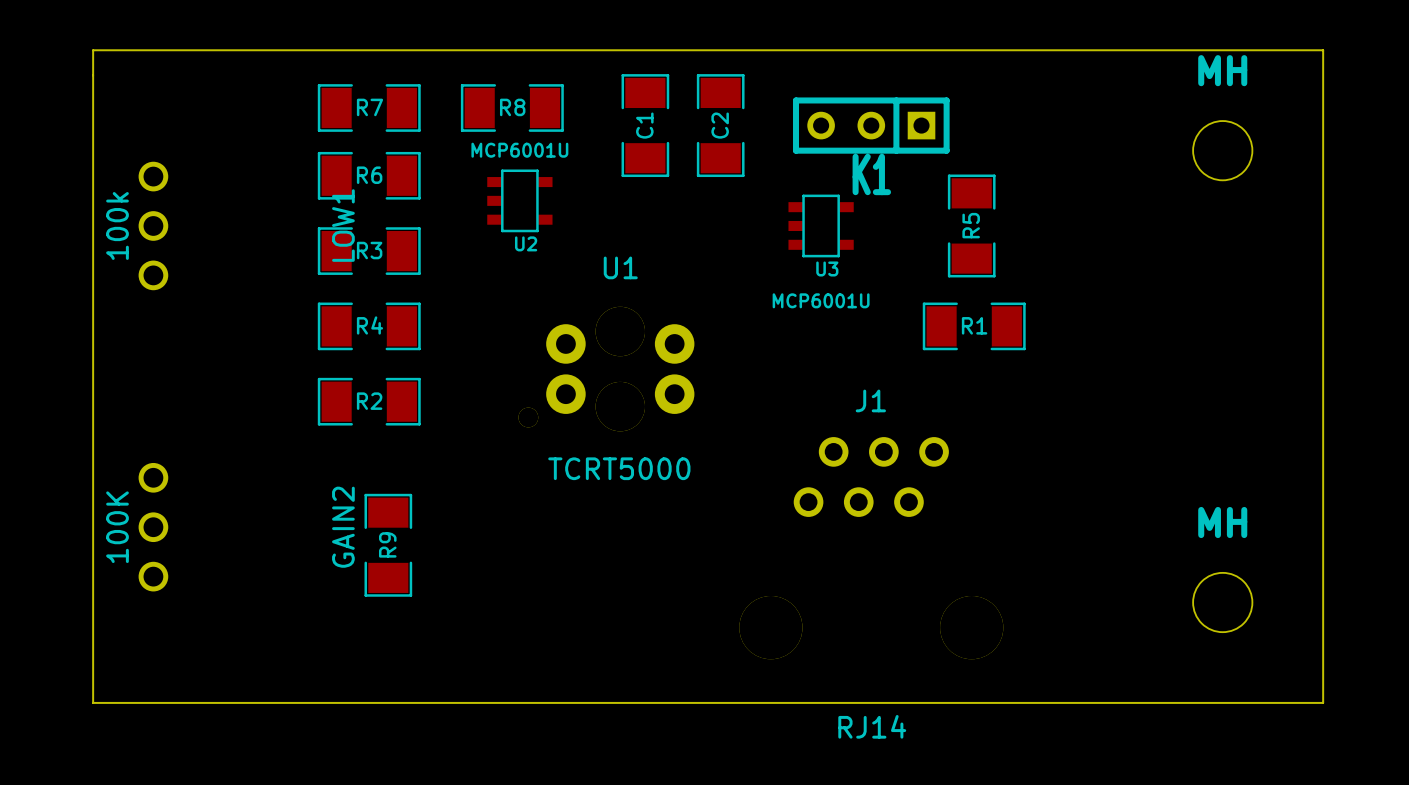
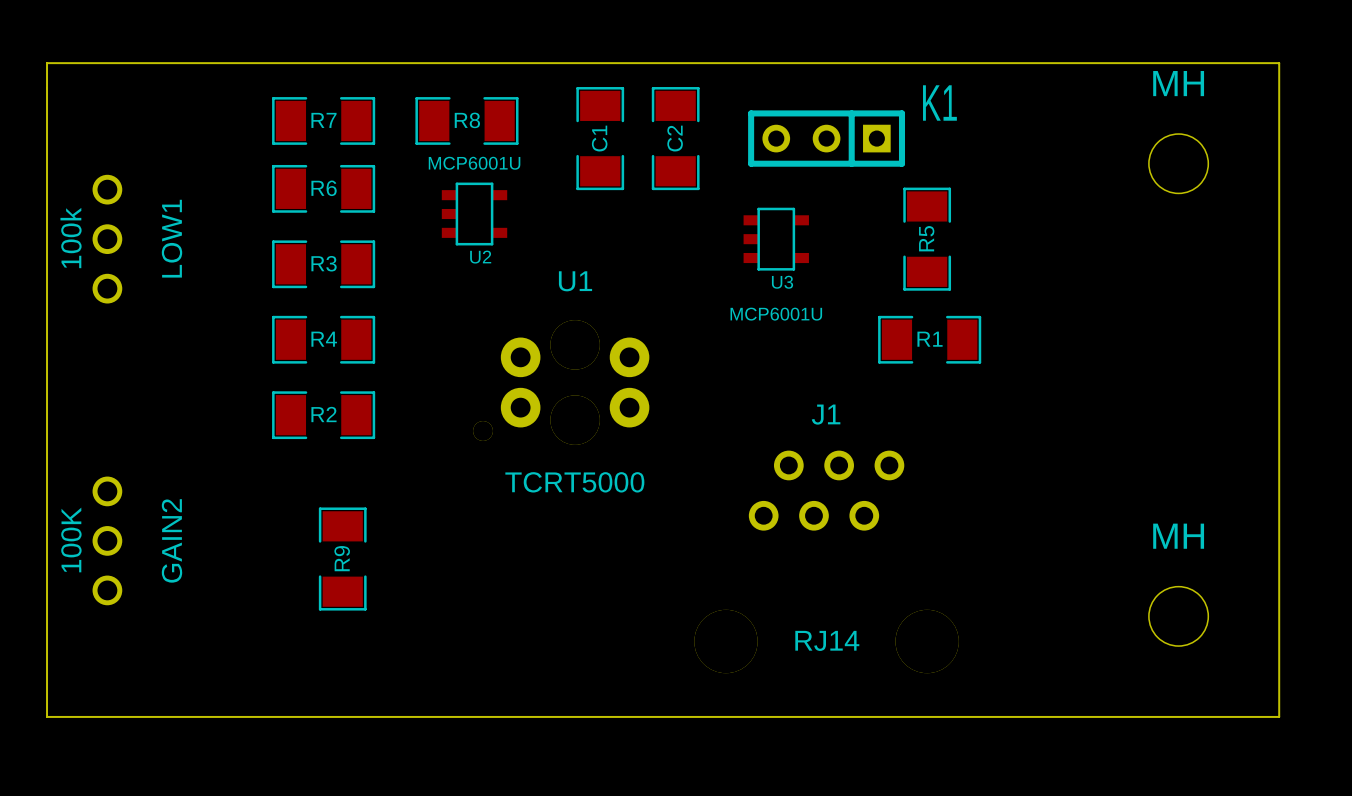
K1 name position: K1 (871, 174) -> K1 (939, 102)
LOW1 name position: LOW1 (343, 225) -> LOW1 (172, 238)
GAIN2 name position: GAIN2 (343, 527) -> GAIN2 (172, 540)
J1 value position: RJ14 (872, 726) -> RJ14 (827, 640)

